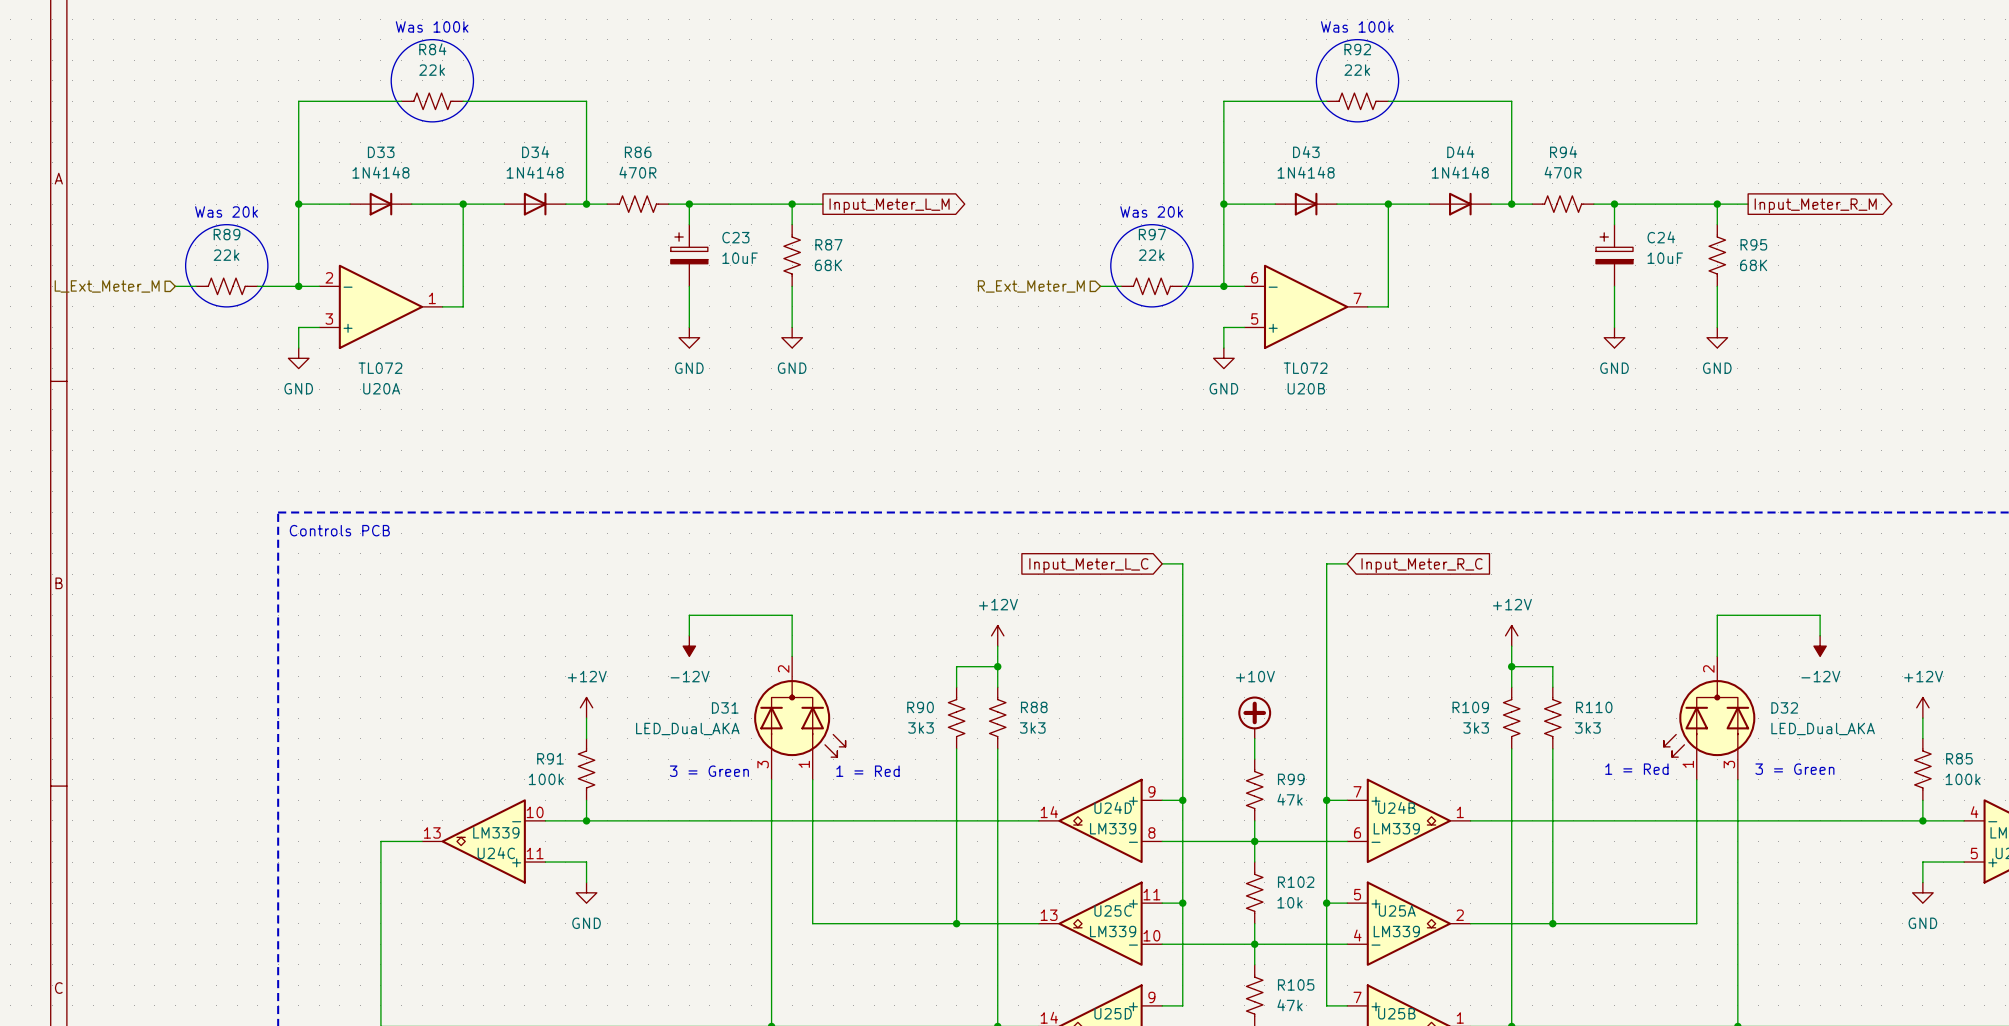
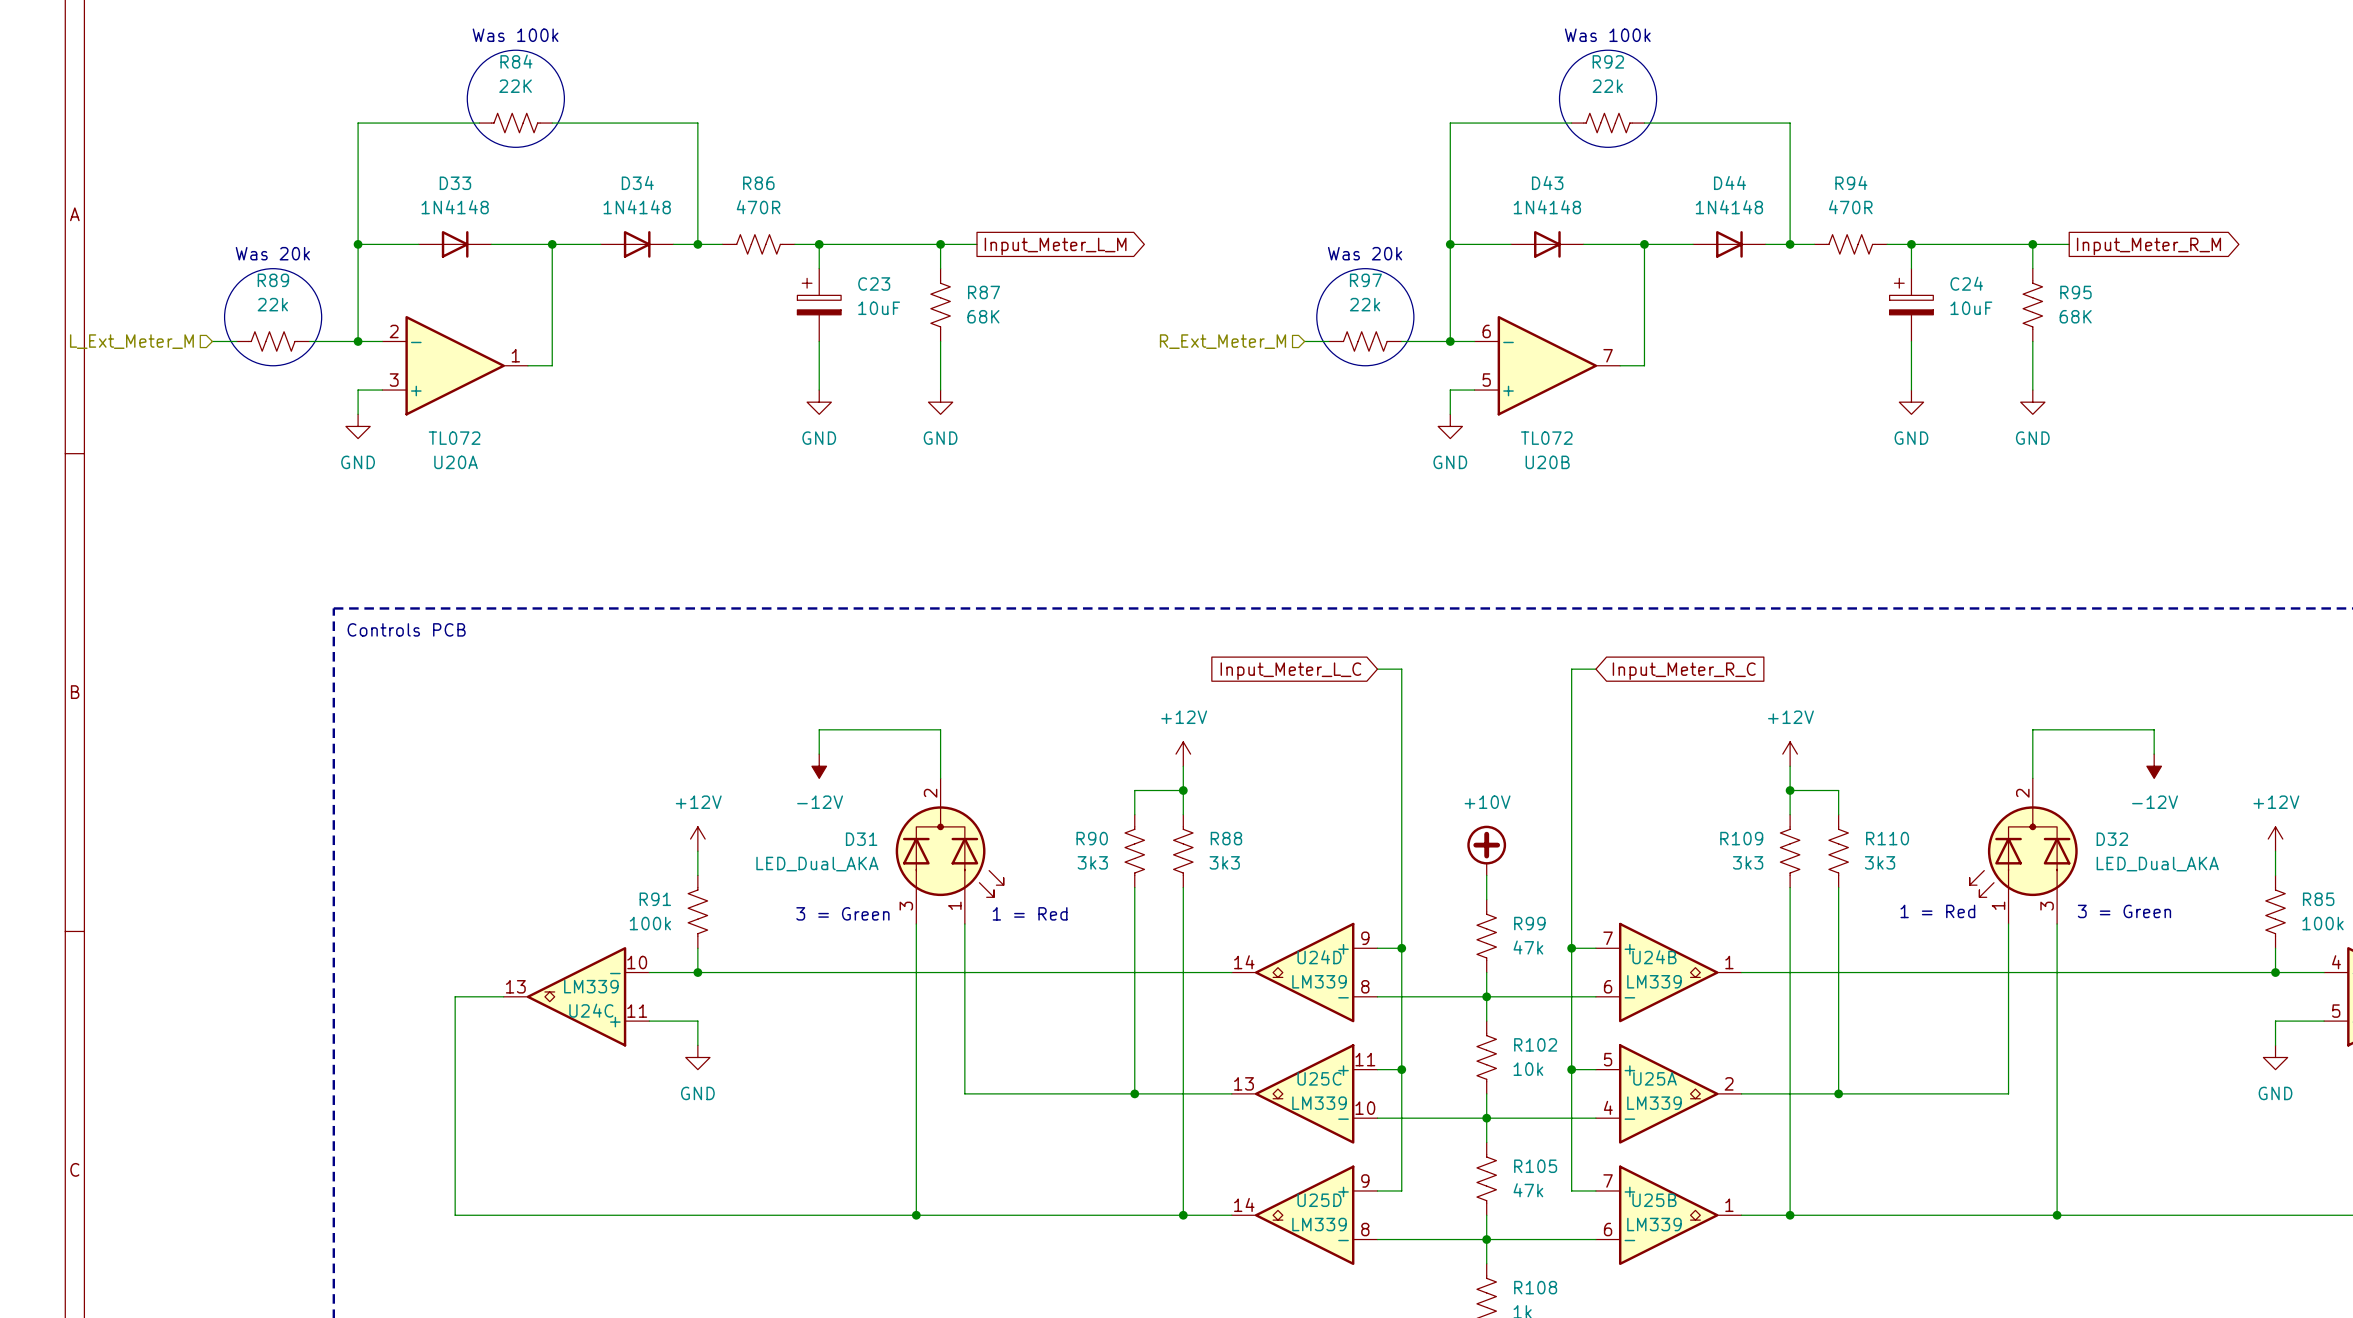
R84 value: 22k (432, 70) -> 22K (515, 86)

